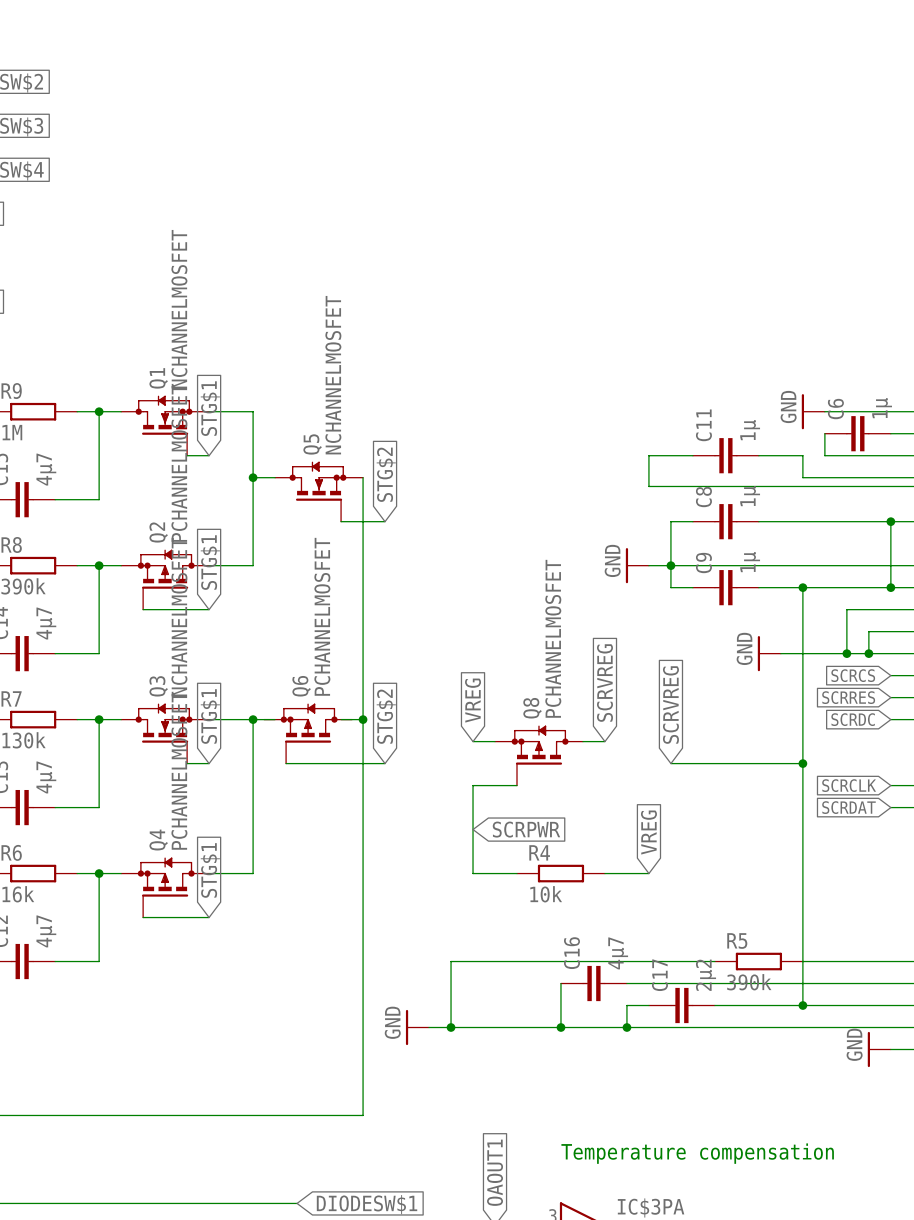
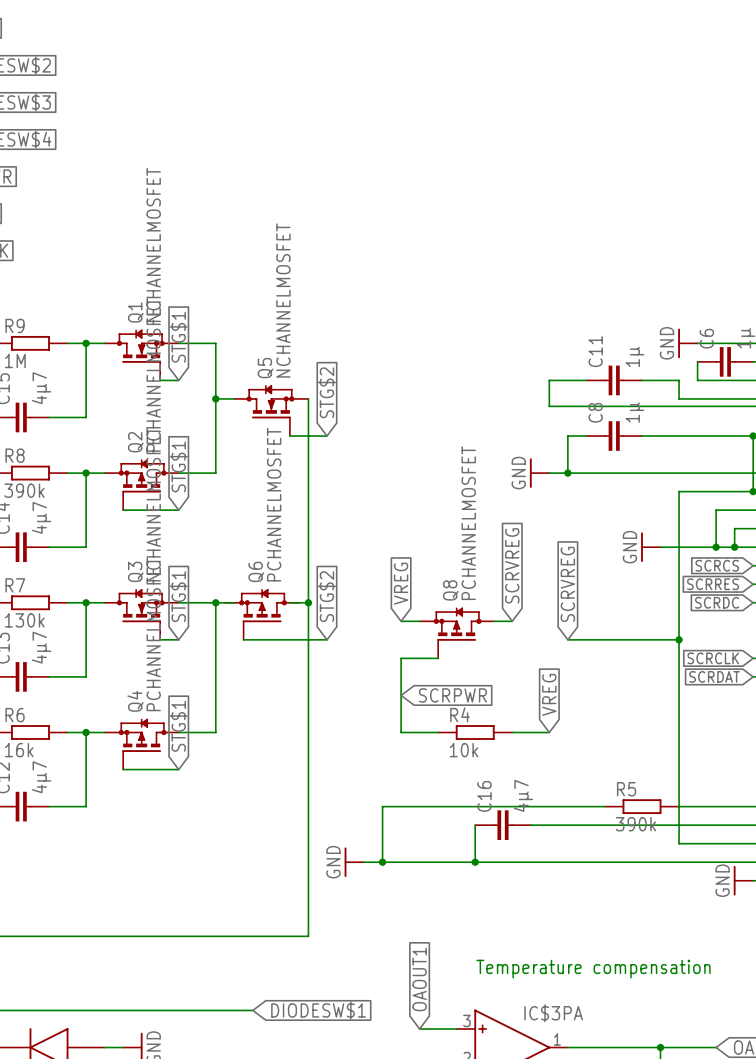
wire: (670, 565) (670, 587) (692, 587) -> none
C9: 1µ (725, 587) -> none
wire: (758, 587) (802, 587) -> none
junction: (802, 587) -> none
wire: (648, 1005) (626, 1005) (626, 1027) -> none
C17: 2µ2 (681, 1005) -> none
wire: (714, 1005) (802, 1005) -> none
junction: (802, 1005) -> none
junction: (626, 1027) -> none

